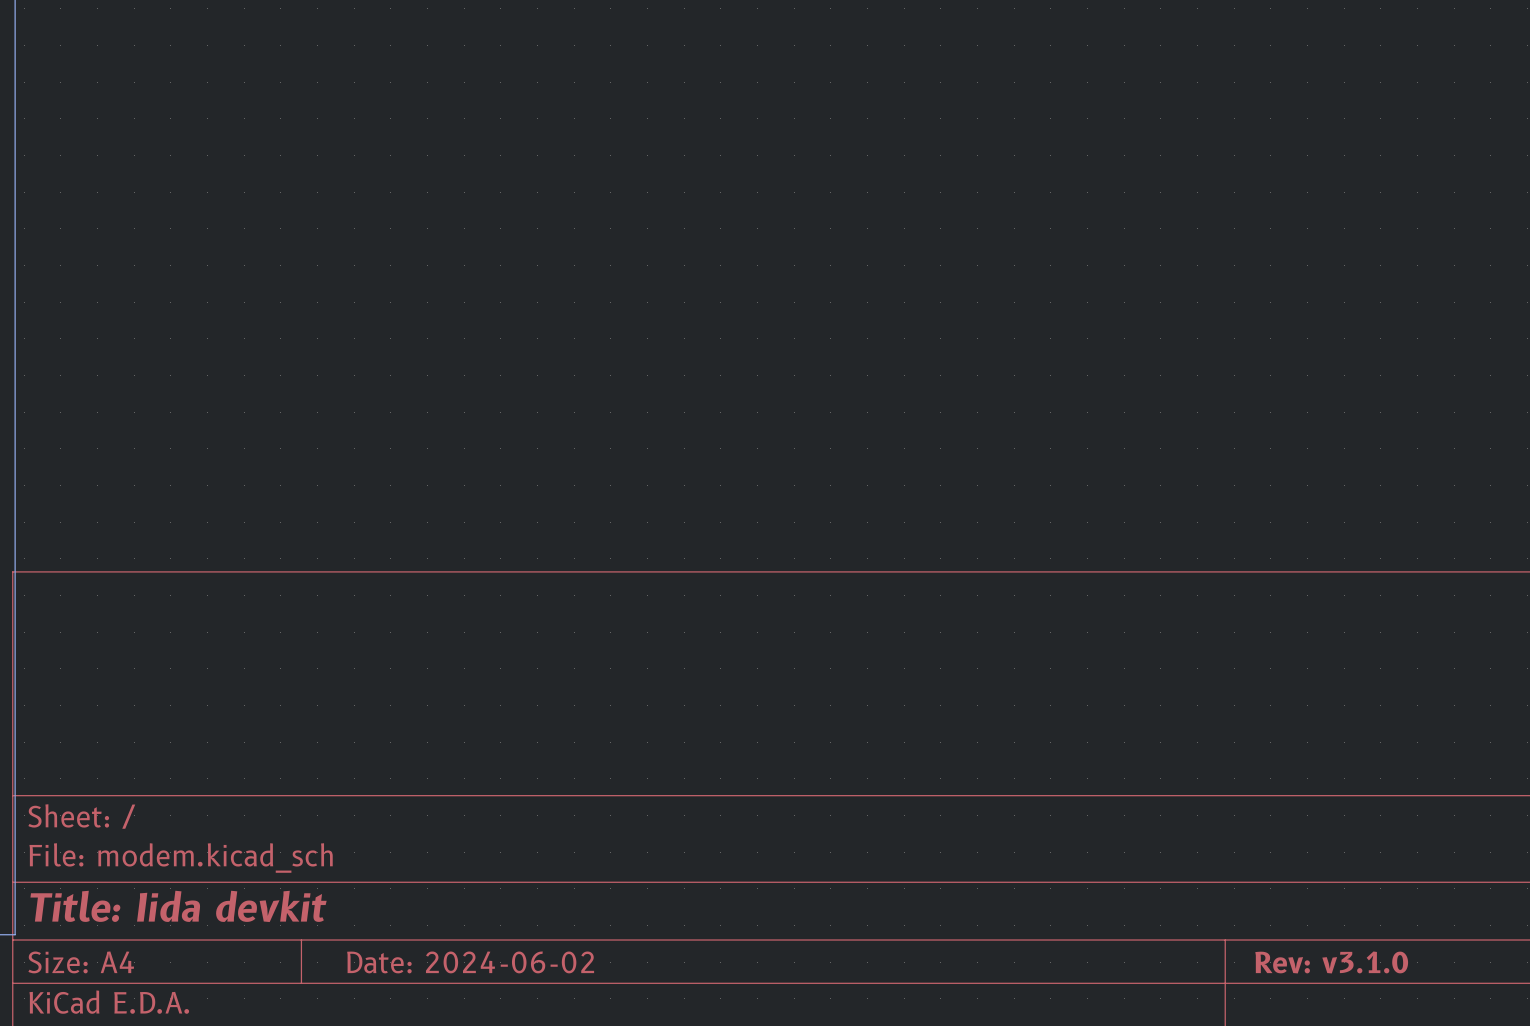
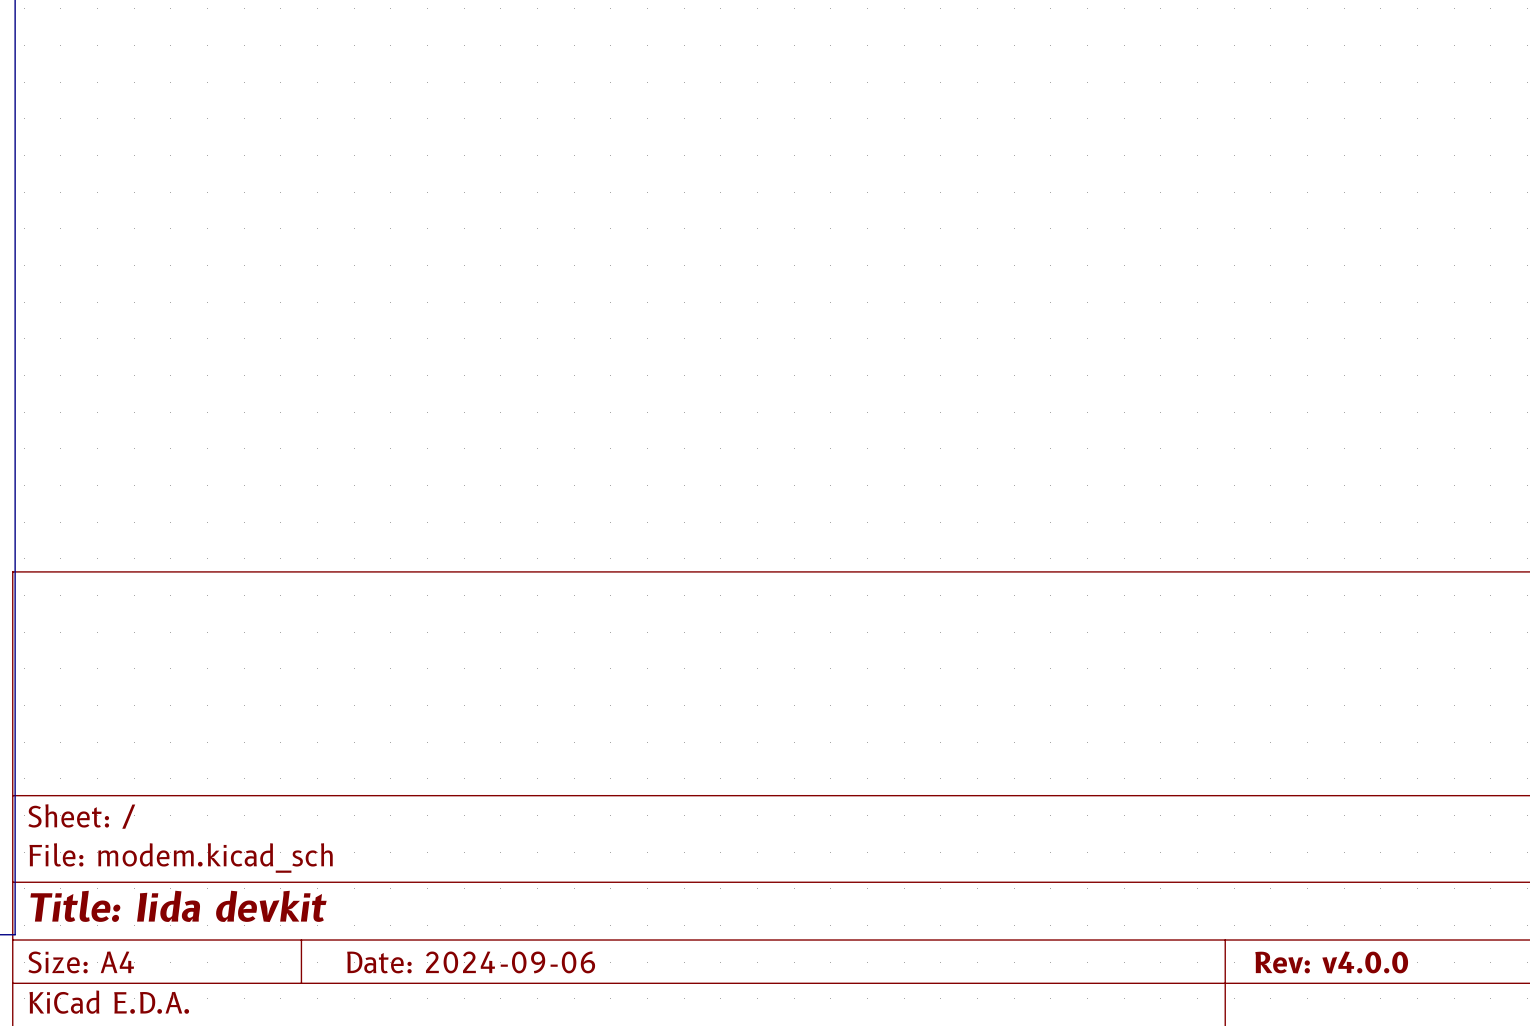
title block: Date: 2024-06-02 (470, 962) -> Date: 2024-09-06 (471, 962)
title block: Rev: v3.1.0 (1331, 962) -> Rev: v4.0.0 (1331, 962)

